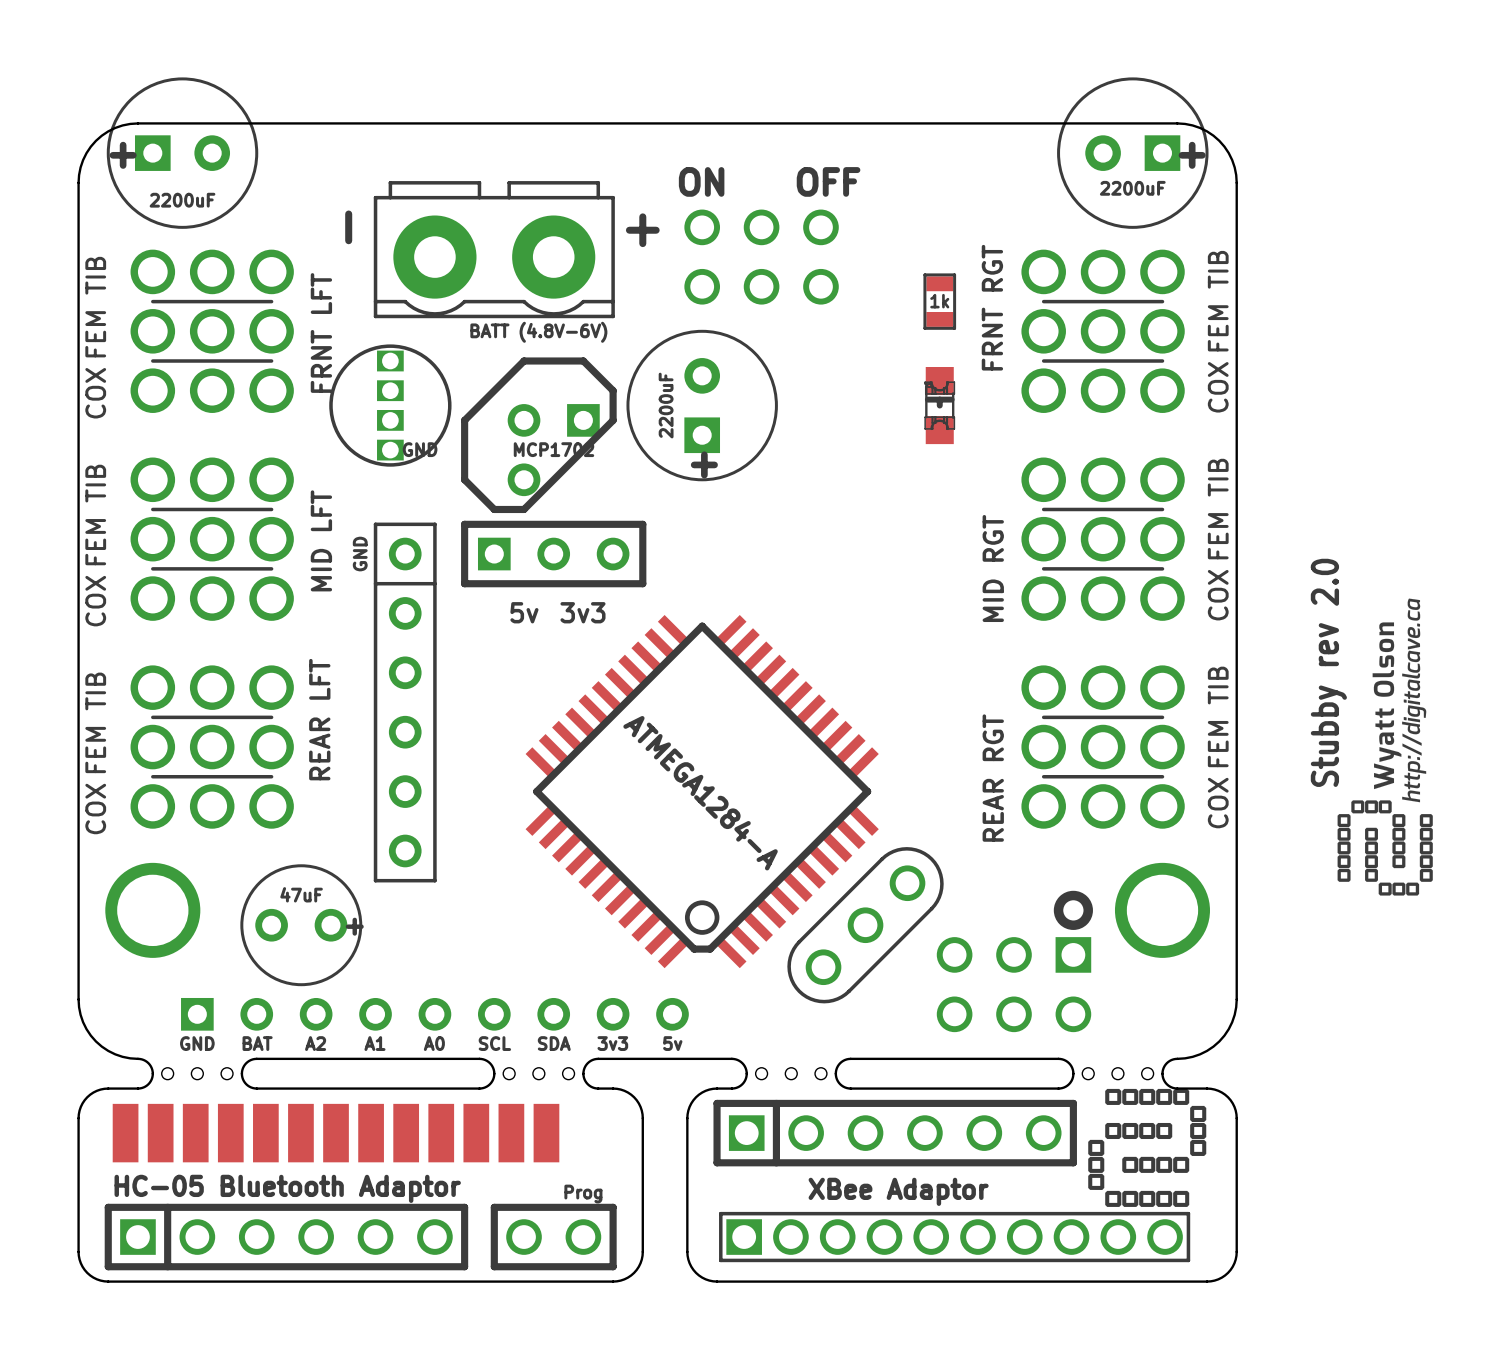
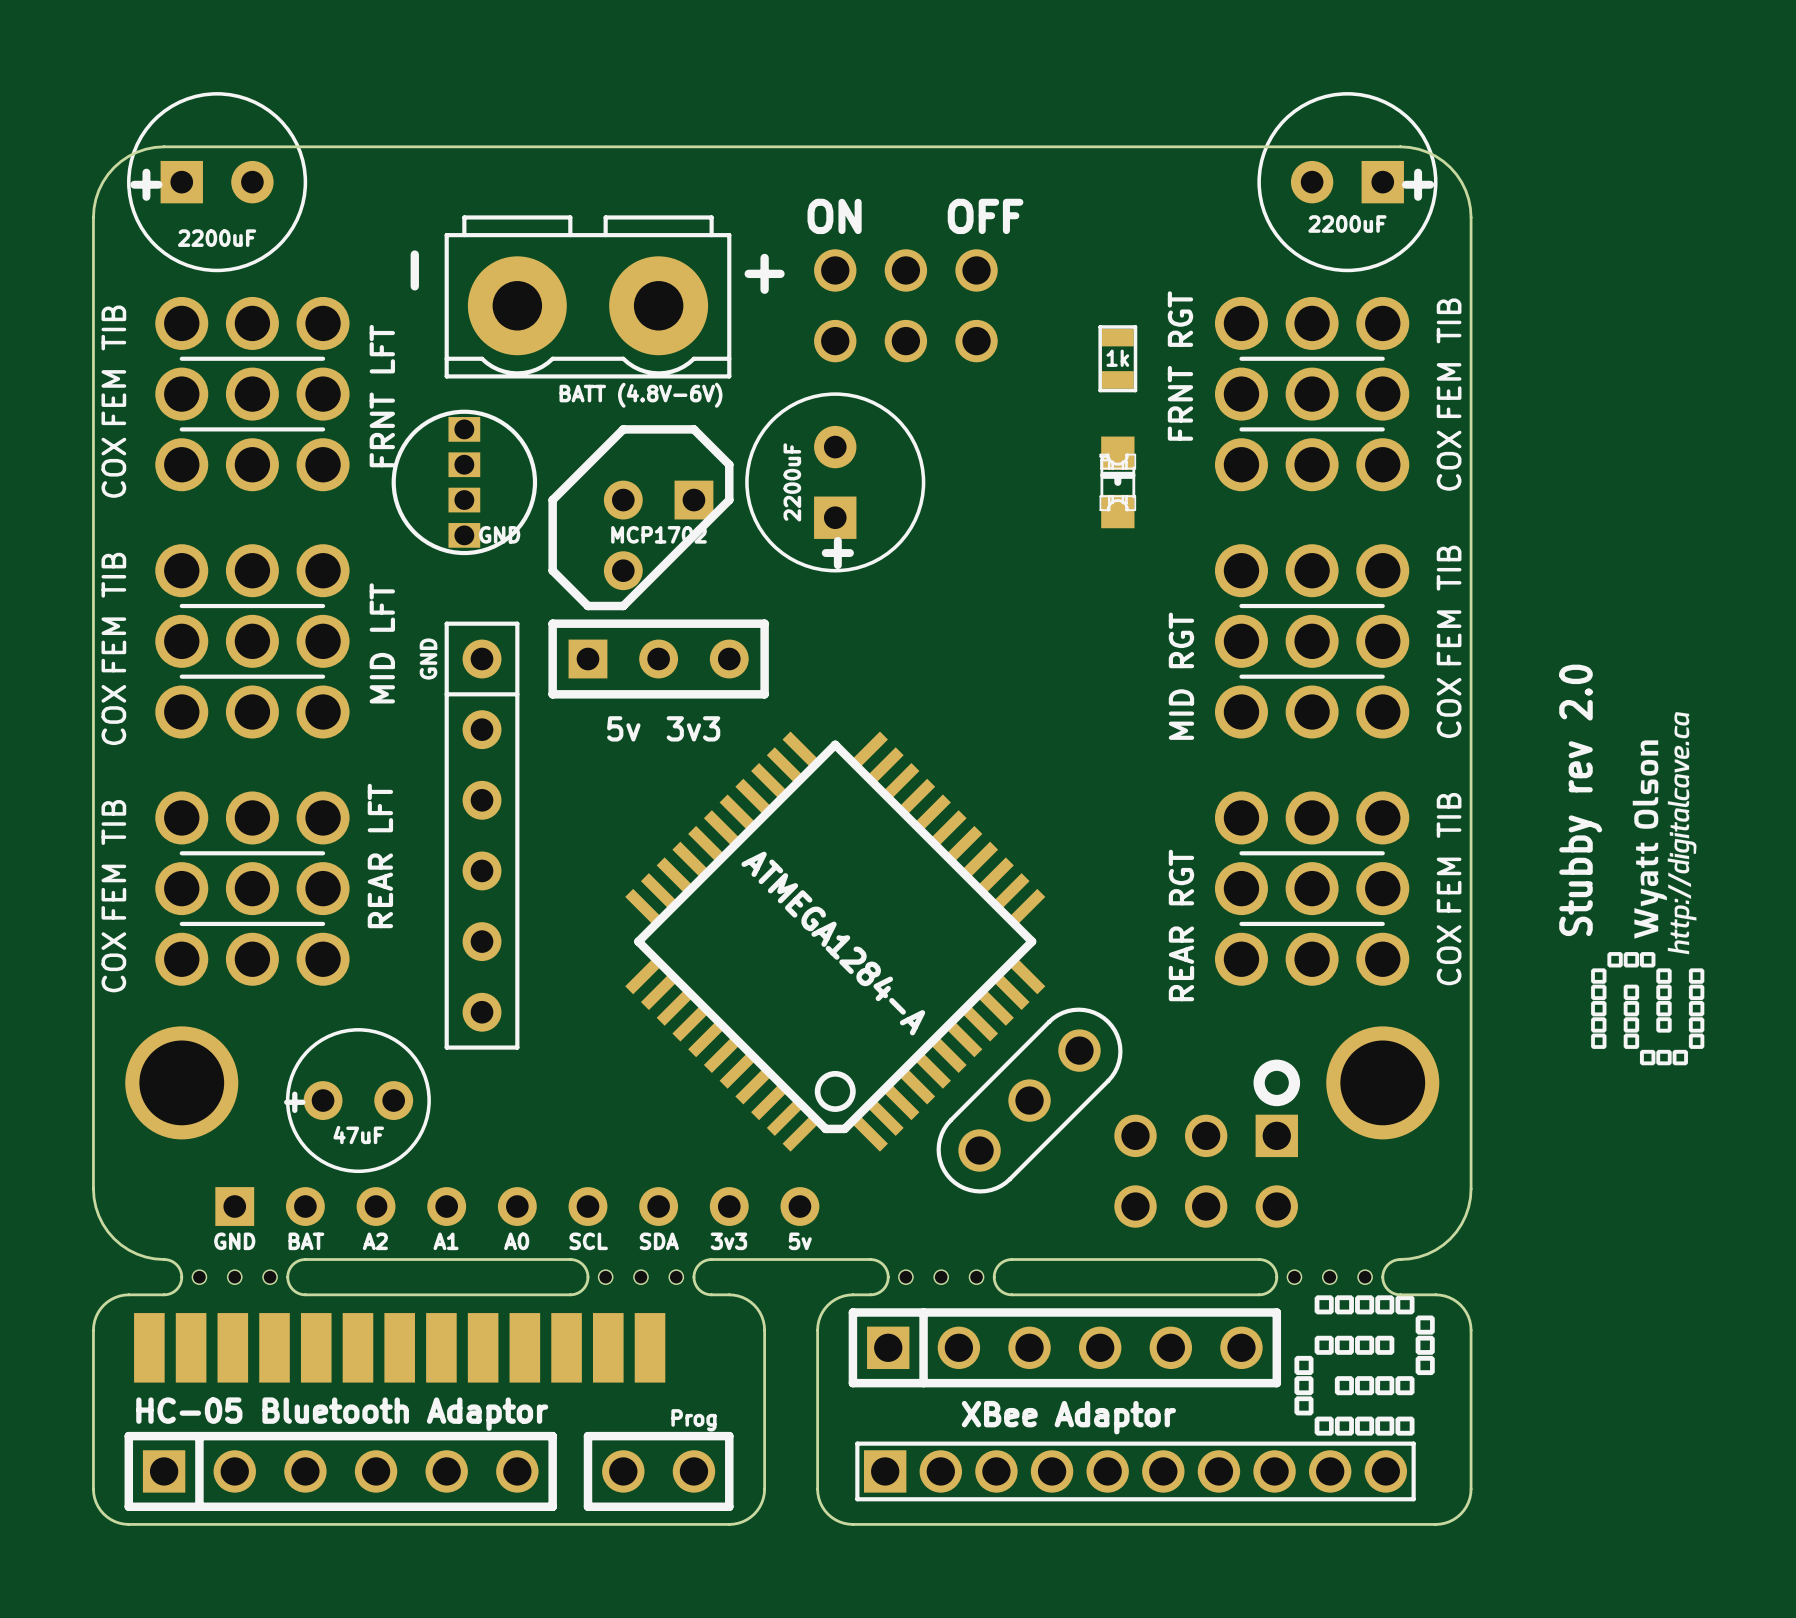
part rotation: 0° (301, 925) -> 180° (358, 1100)

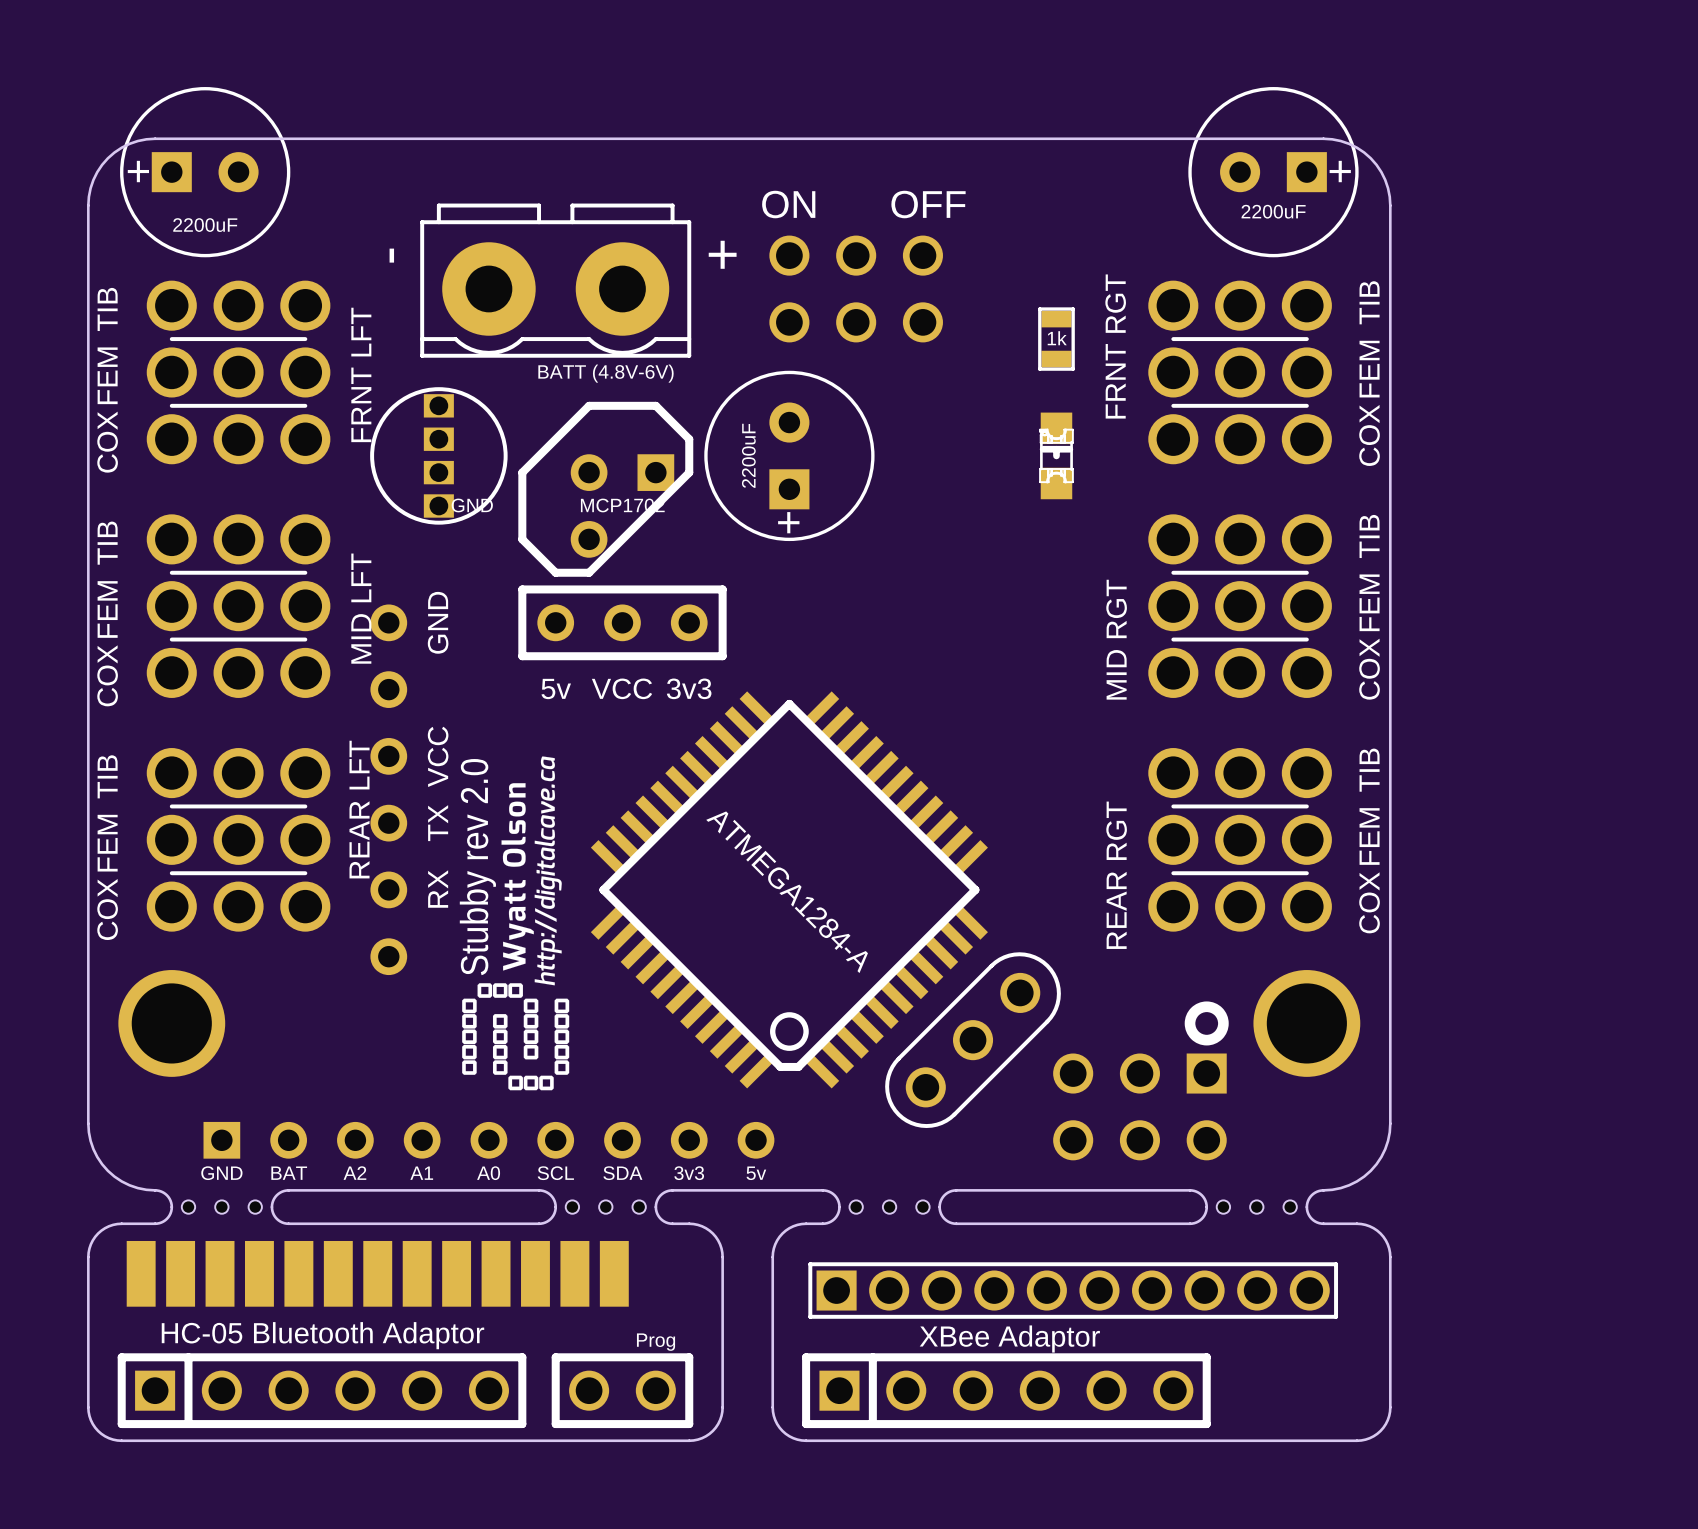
part footprint: [548, 619, 769, 699] -> [518, 585, 727, 661]
drawing: [1591, 712, 1705, 1066] -> none
drawing: none -> [462, 756, 570, 1091]
text: Stubby rev 2.0 (1580, 800) -> none
part: none -> (388, 789)
part: (482, 835) -> none
text: none -> Stubby rev 2.0 (477, 867)
part: 47uF (358, 1100) -> none
drawing: [1294, 1295, 1435, 1436] -> none
part position: (1064, 1347) -> (1006, 1390)
part position: (1135, 1471) -> (1073, 1290)

